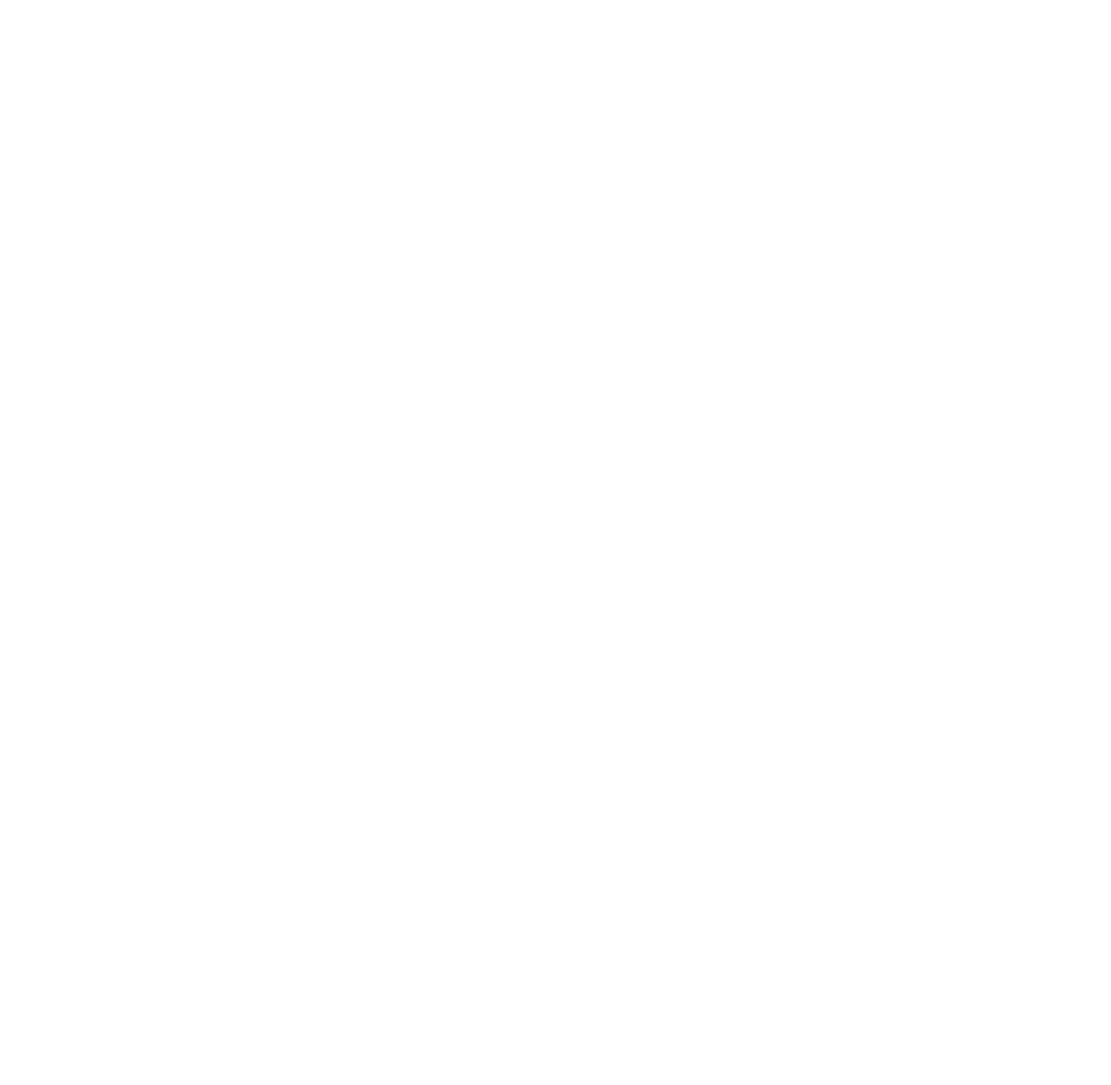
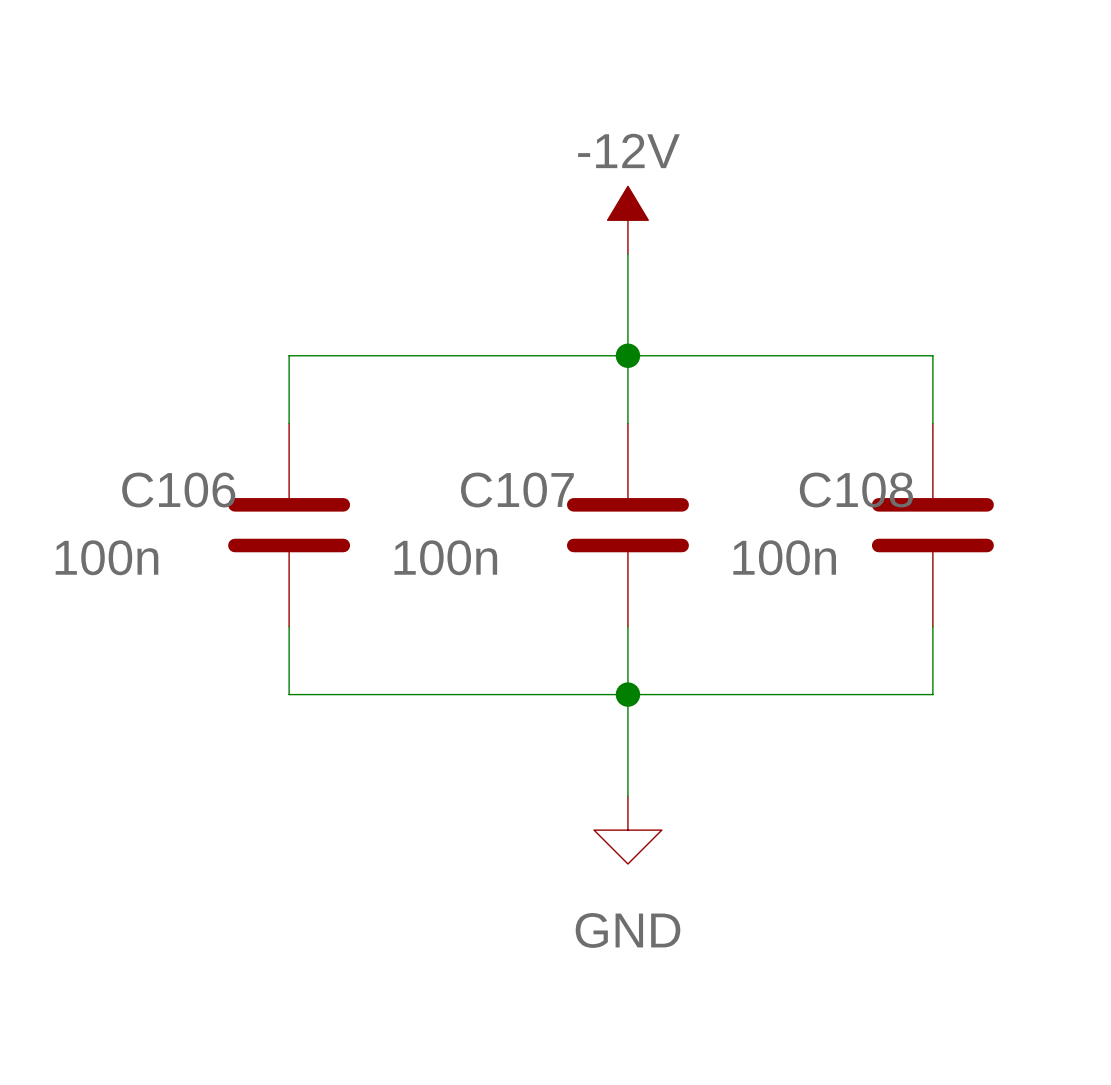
power symbol: none -> -12V (627, 220)
wire: none -> (627, 254) (627, 423)
junction: none -> (627, 355)
wire: none -> (289, 423) (289, 355) (932, 355) (932, 423)
C106: none -> 100n (289, 525)
C107: none -> 100n (627, 525)
C108: none -> 100n (932, 525)
wire: none -> (289, 626) (289, 694) (932, 694) (932, 626)
wire: none -> (627, 626) (627, 796)
junction: none -> (627, 694)
power symbol: none -> GND (627, 830)

